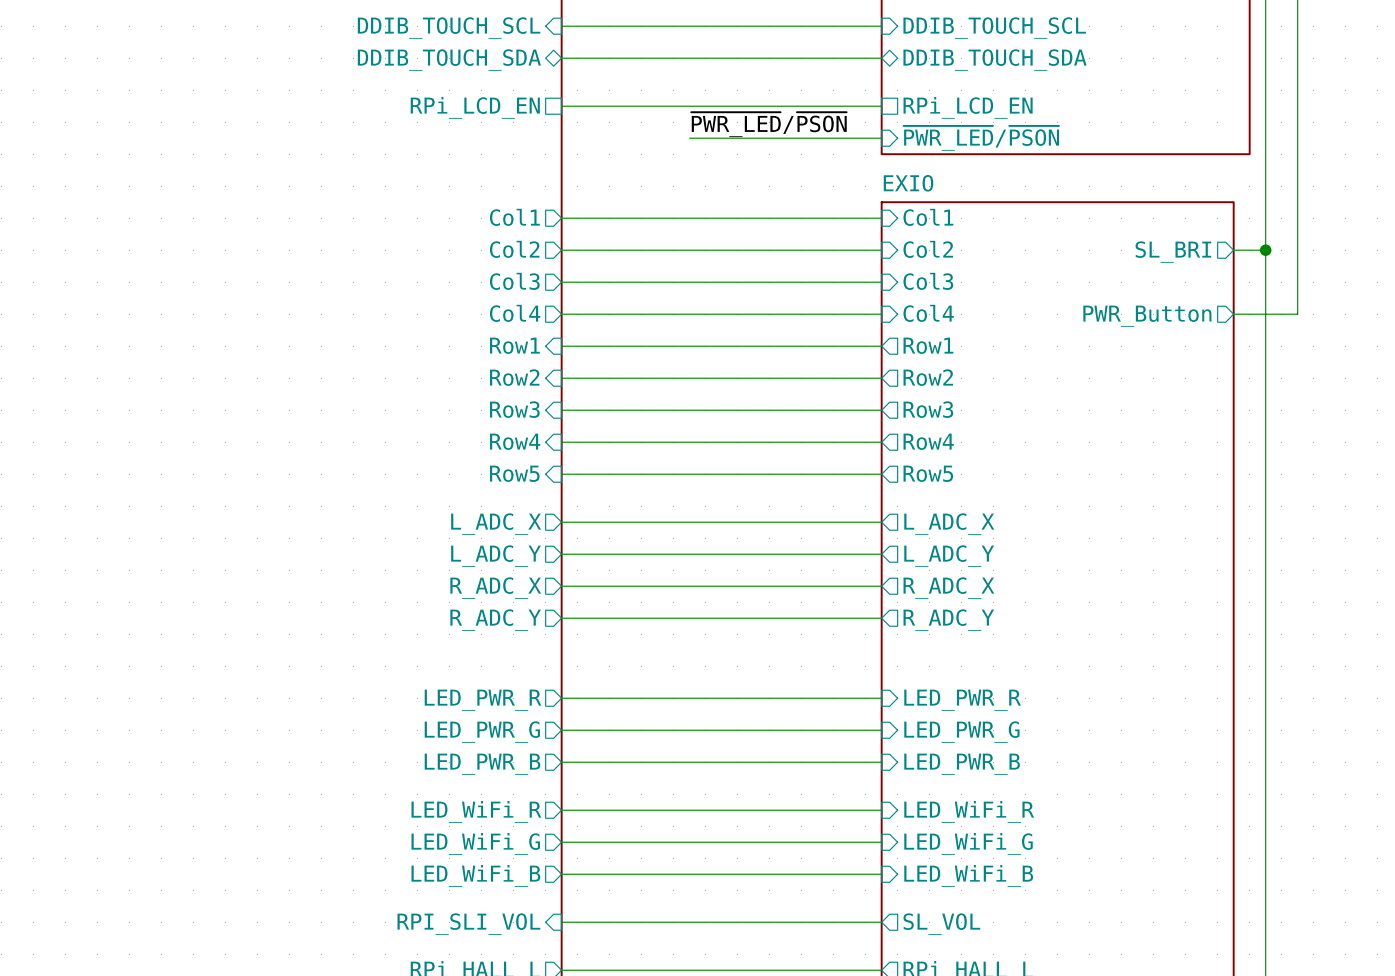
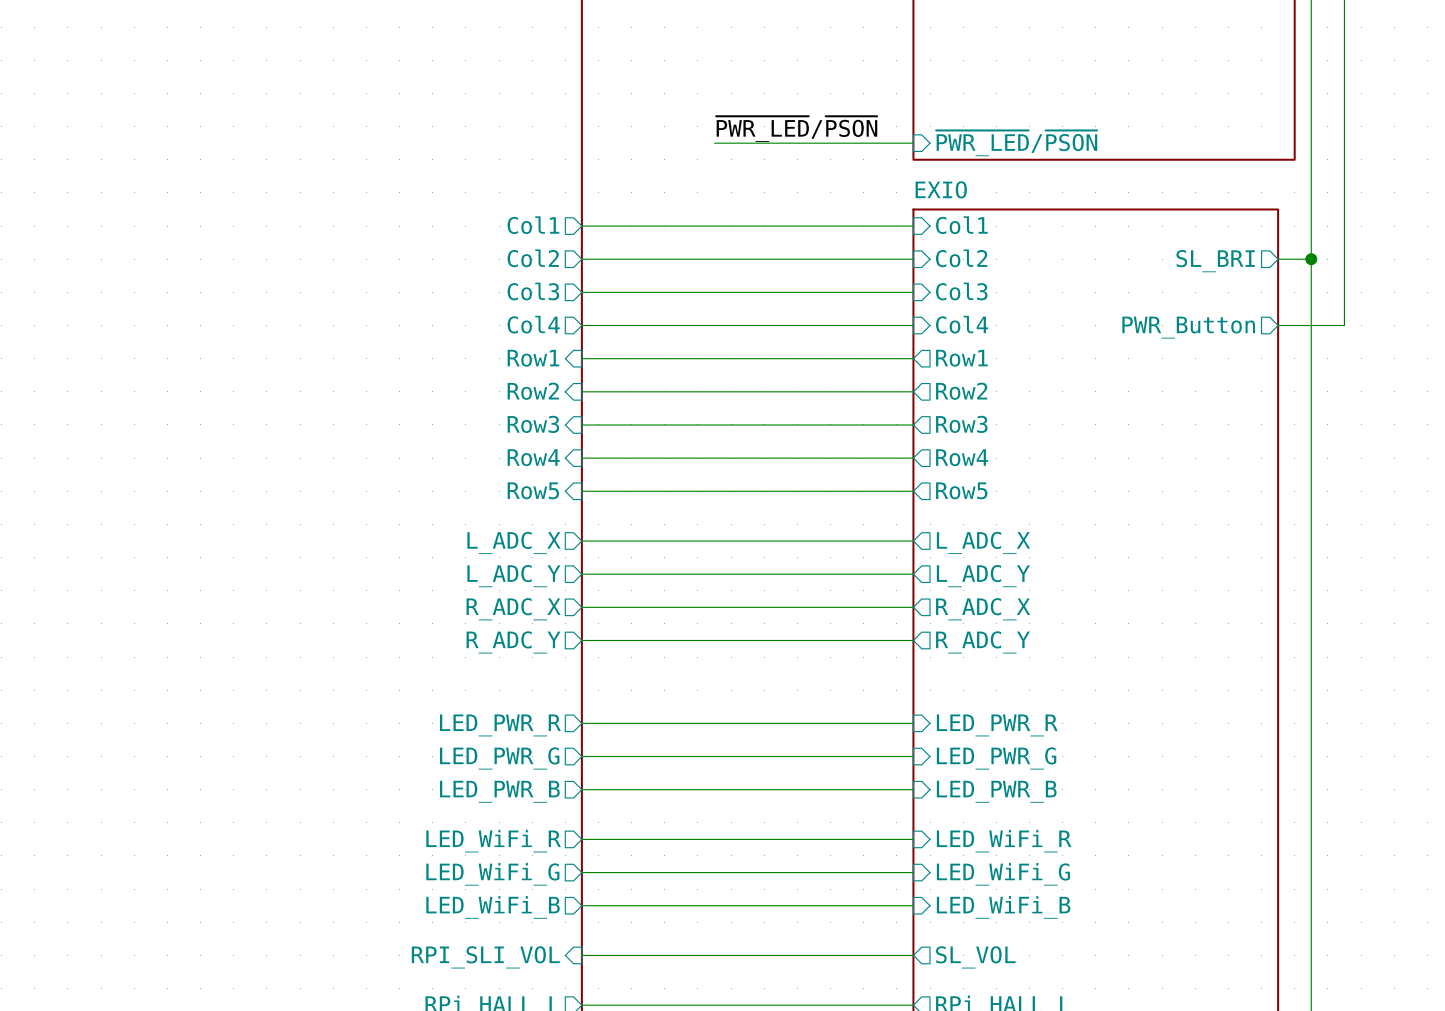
wire: (561, 26) (881, 26) -> none
sheet pin: DDIB_TOUCH_SCL (449, 28) -> none
sheet pin: DDIB_TOUCH_SCL (994, 28) -> none
wire: (561, 58) (881, 58) -> none
sheet pin: DDIB_TOUCH_SDA (449, 60) -> none
sheet pin: DDIB_TOUCH_SDA (995, 60) -> none
wire: (561, 106) (881, 106) -> none
sheet pin: RPi_LCD_EN (475, 107) -> none
sheet pin: RPi_LCD_EN (968, 107) -> none

